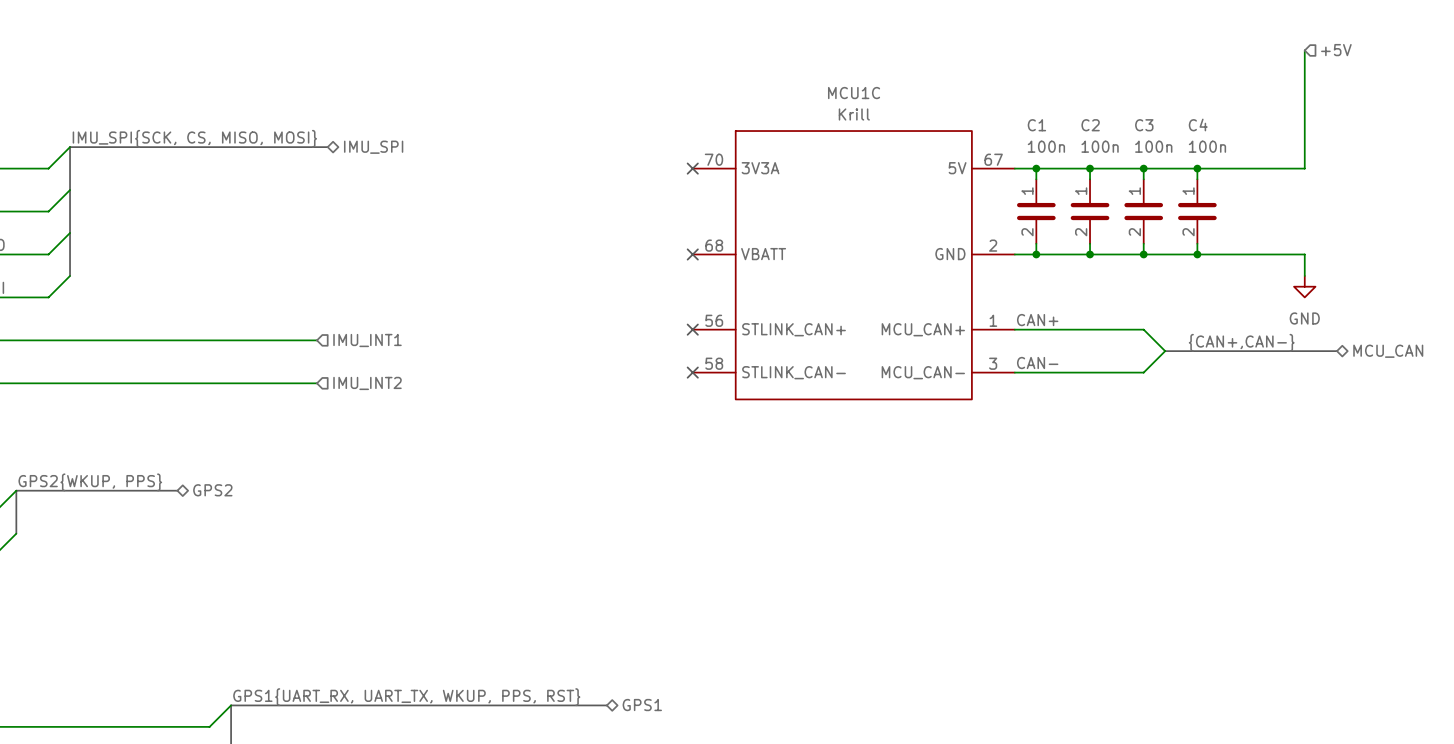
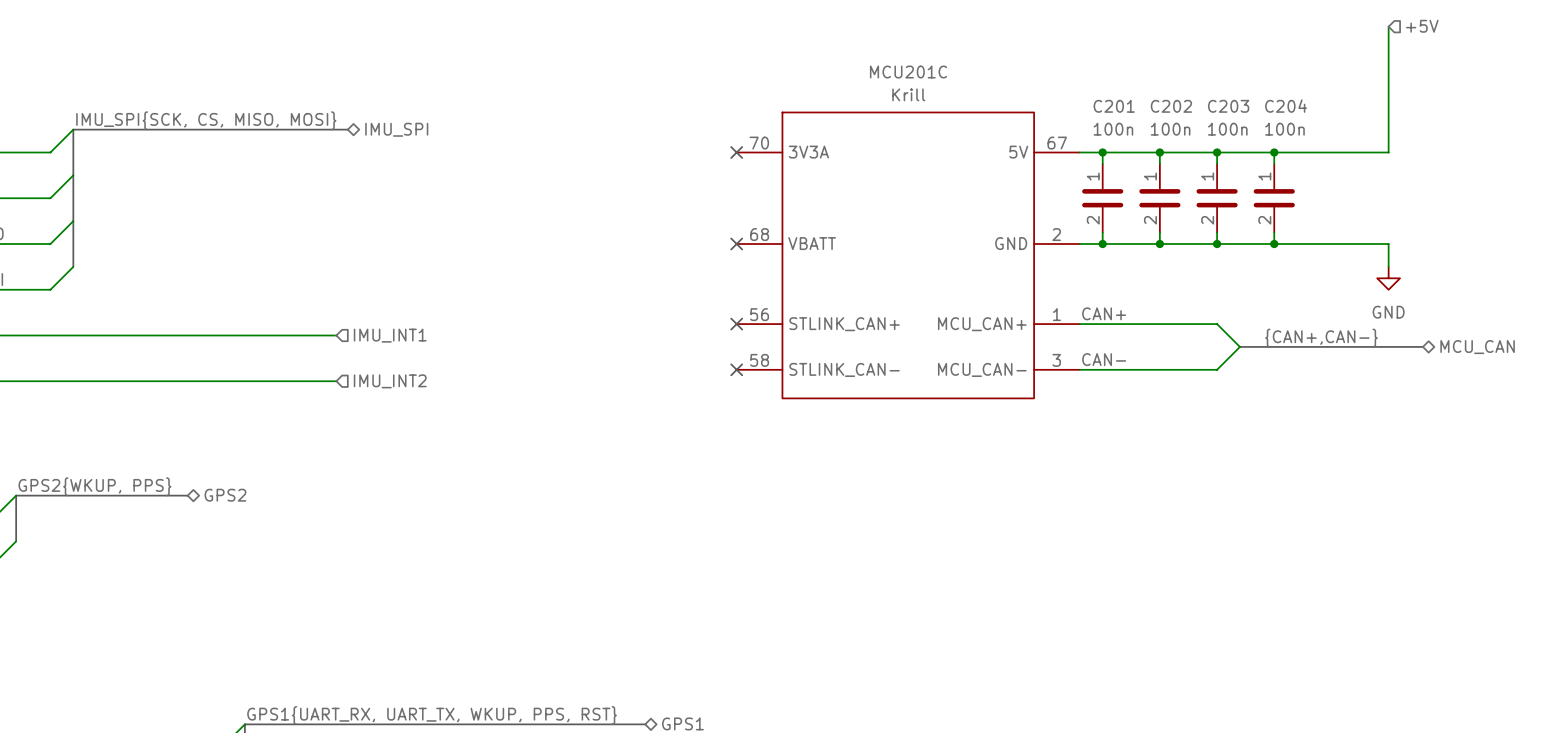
MCU1C name: MCU1C (854, 93) -> MCU201C (908, 72)
C4 name: C4 (1198, 124) -> C204 (1286, 106)
C1 name: C1 (1036, 125) -> C201 (1114, 106)
C2 name: C2 (1090, 125) -> C202 (1171, 106)
C3 name: C3 (1144, 125) -> C203 (1228, 106)

